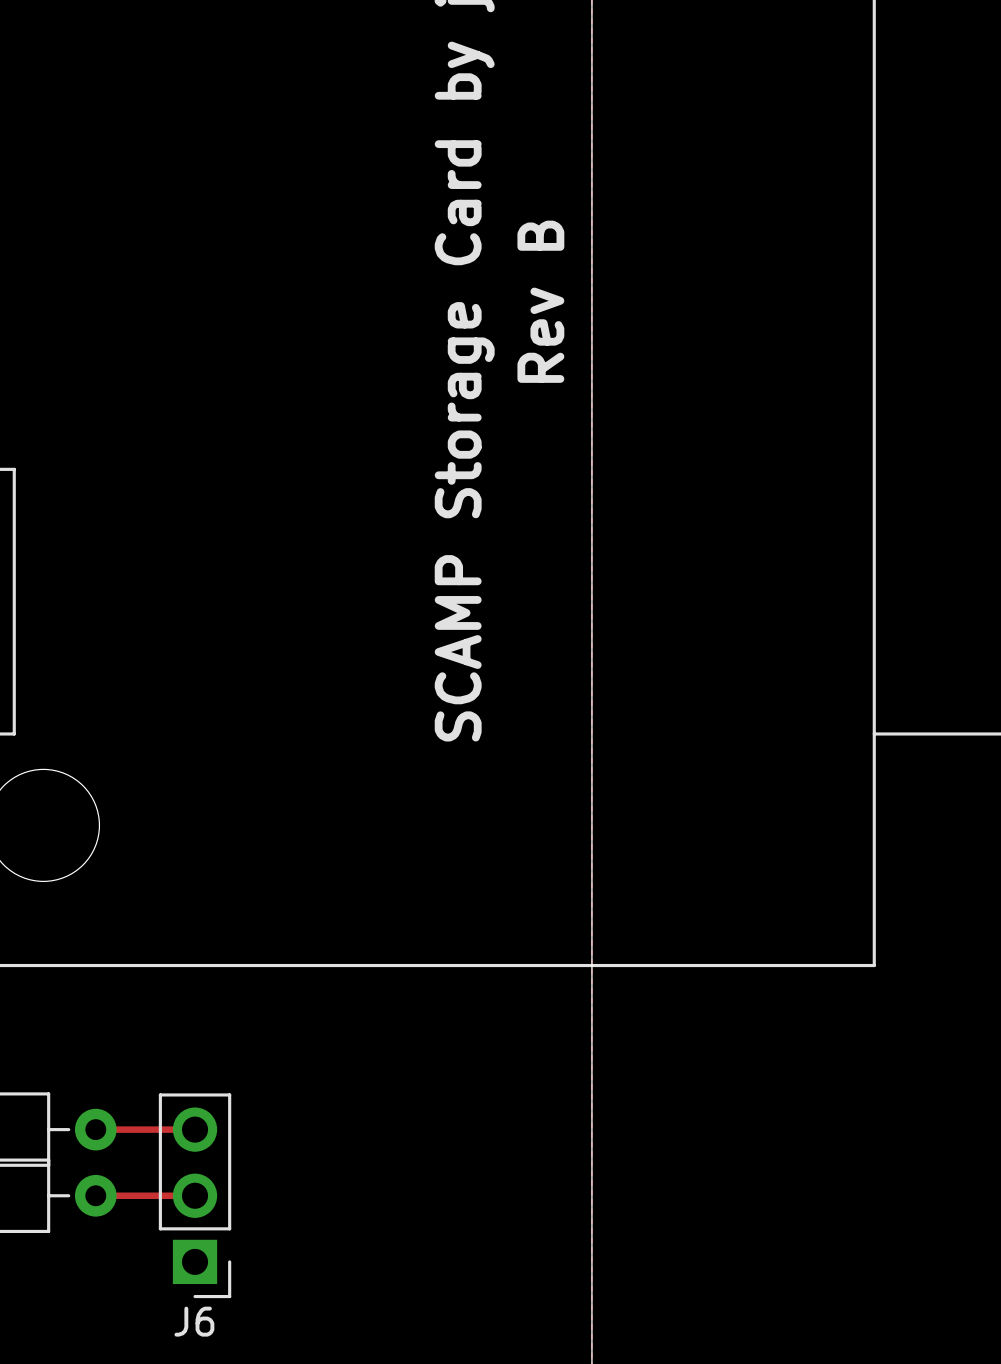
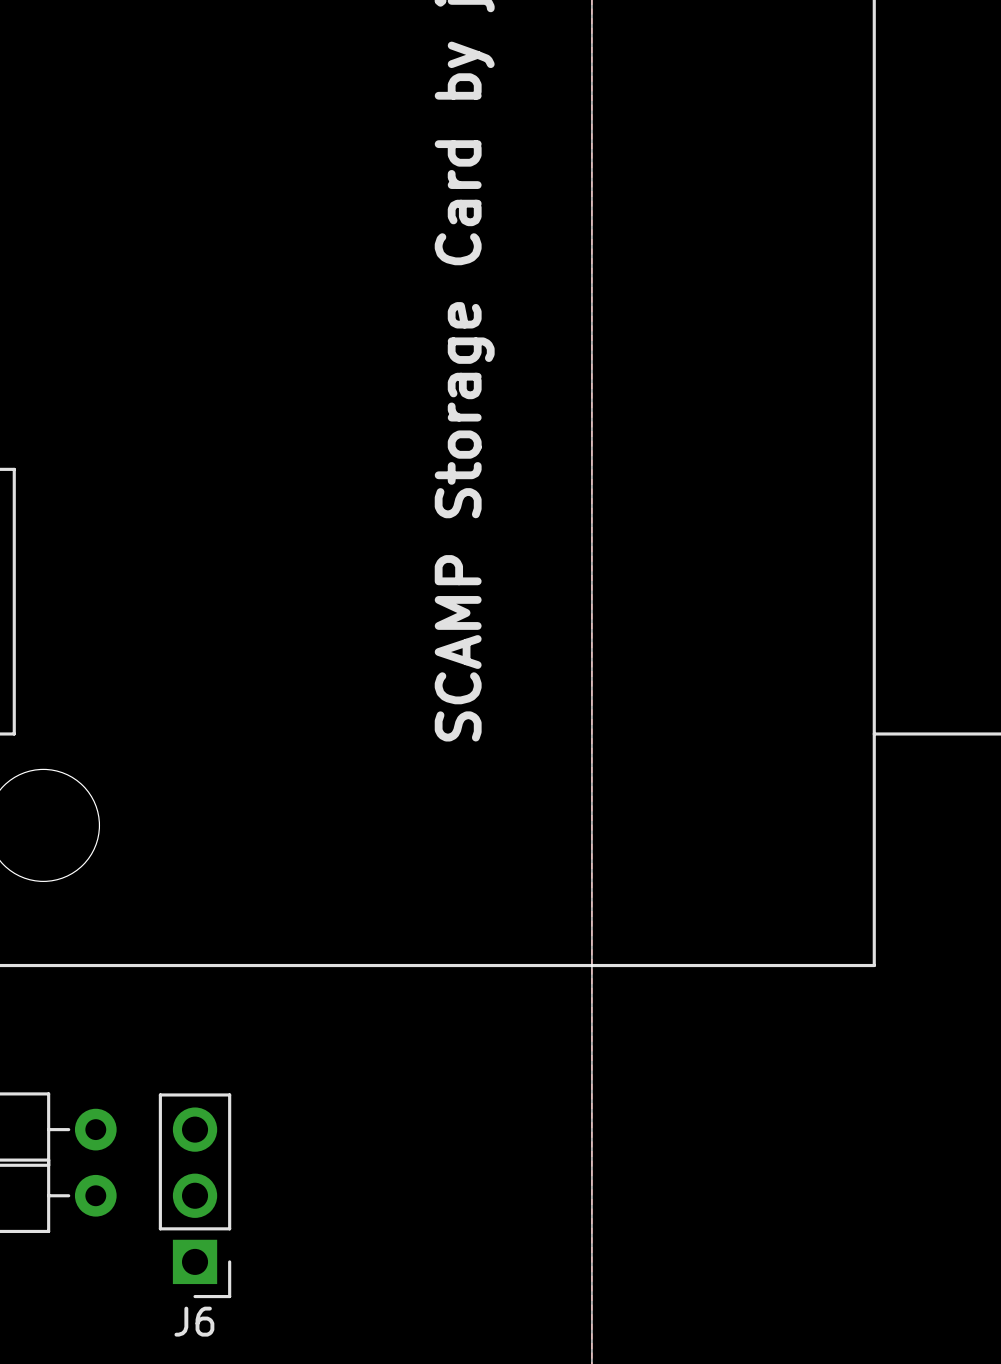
text: Rev B (540, 301) -> none
track: (95, 1129) (195, 1129) -> none
track: (95, 1195) (195, 1195) -> none

